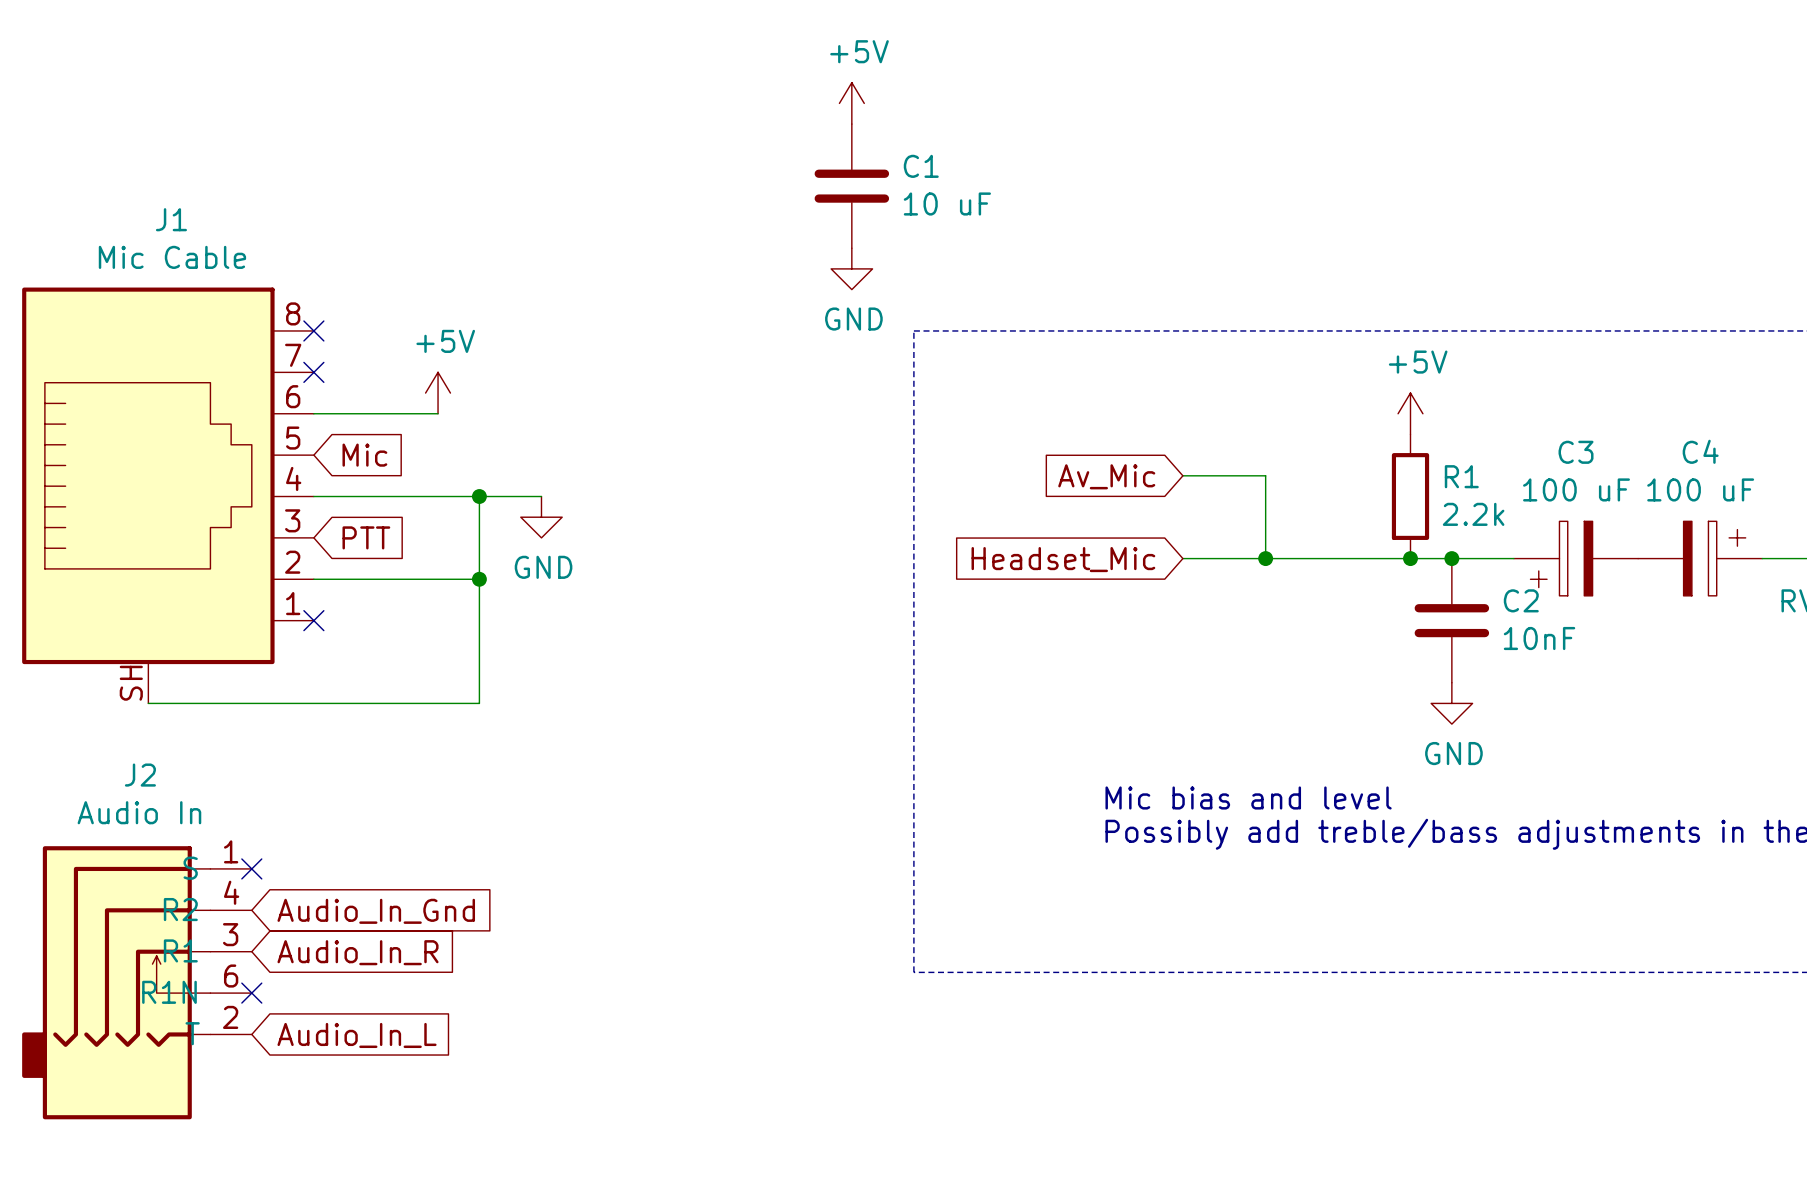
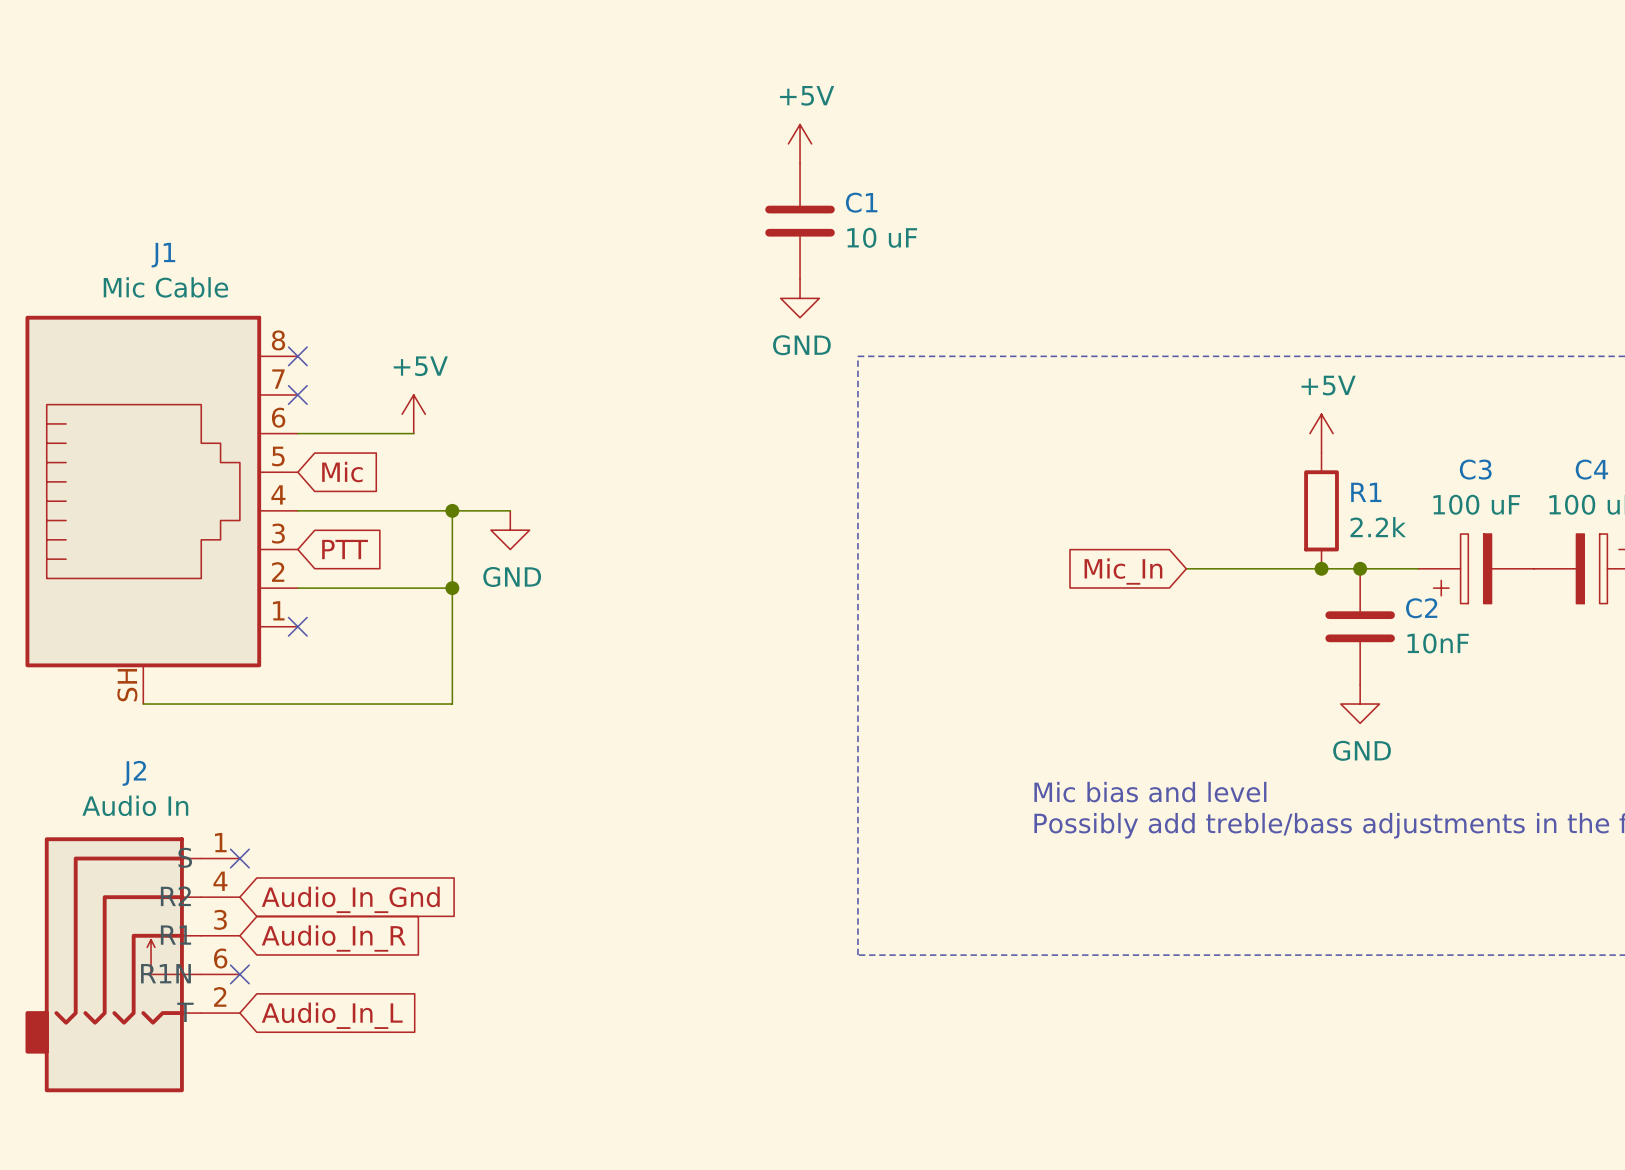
wire: (1182, 475) (1265, 475) (1265, 558) (1182, 558) -> none
global label: Av_Mic (1106, 476) -> none
junction: (1265, 558) -> none
global label: Headset_Mic (1063, 559) -> none
global label: none -> Mic_In (1123, 571)

